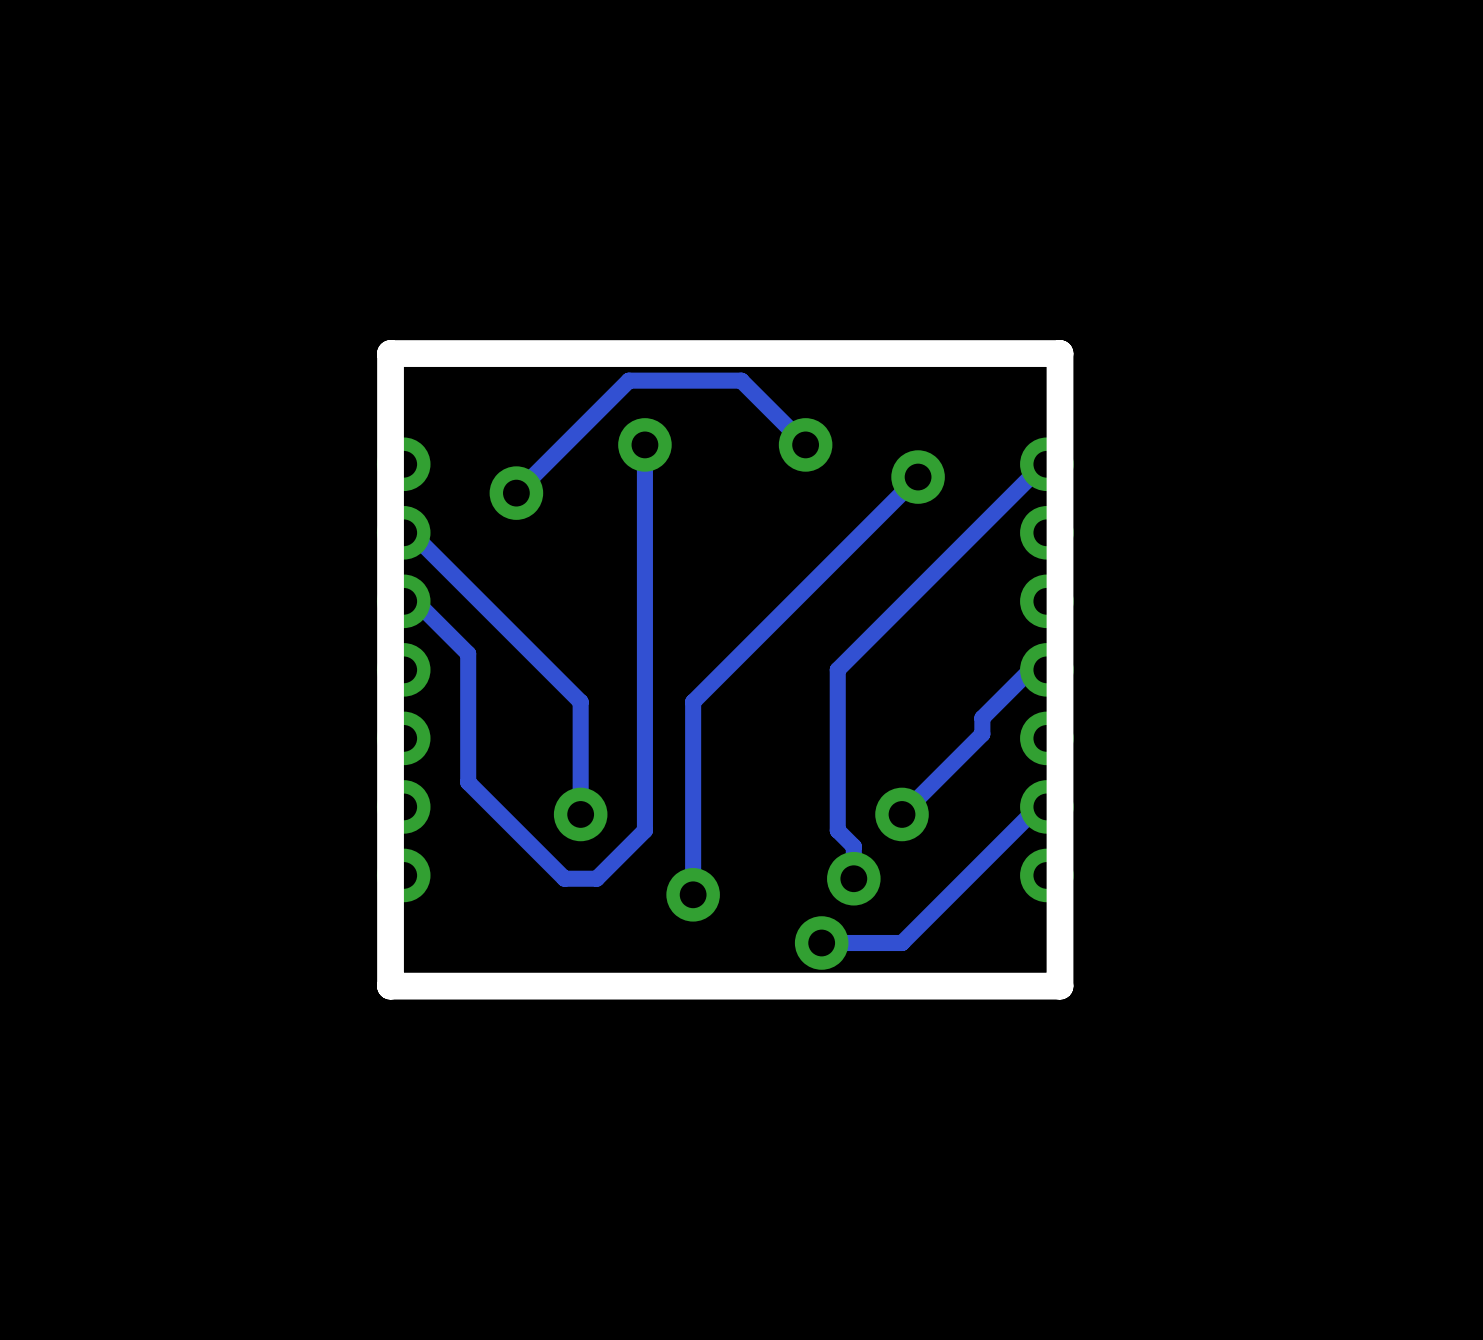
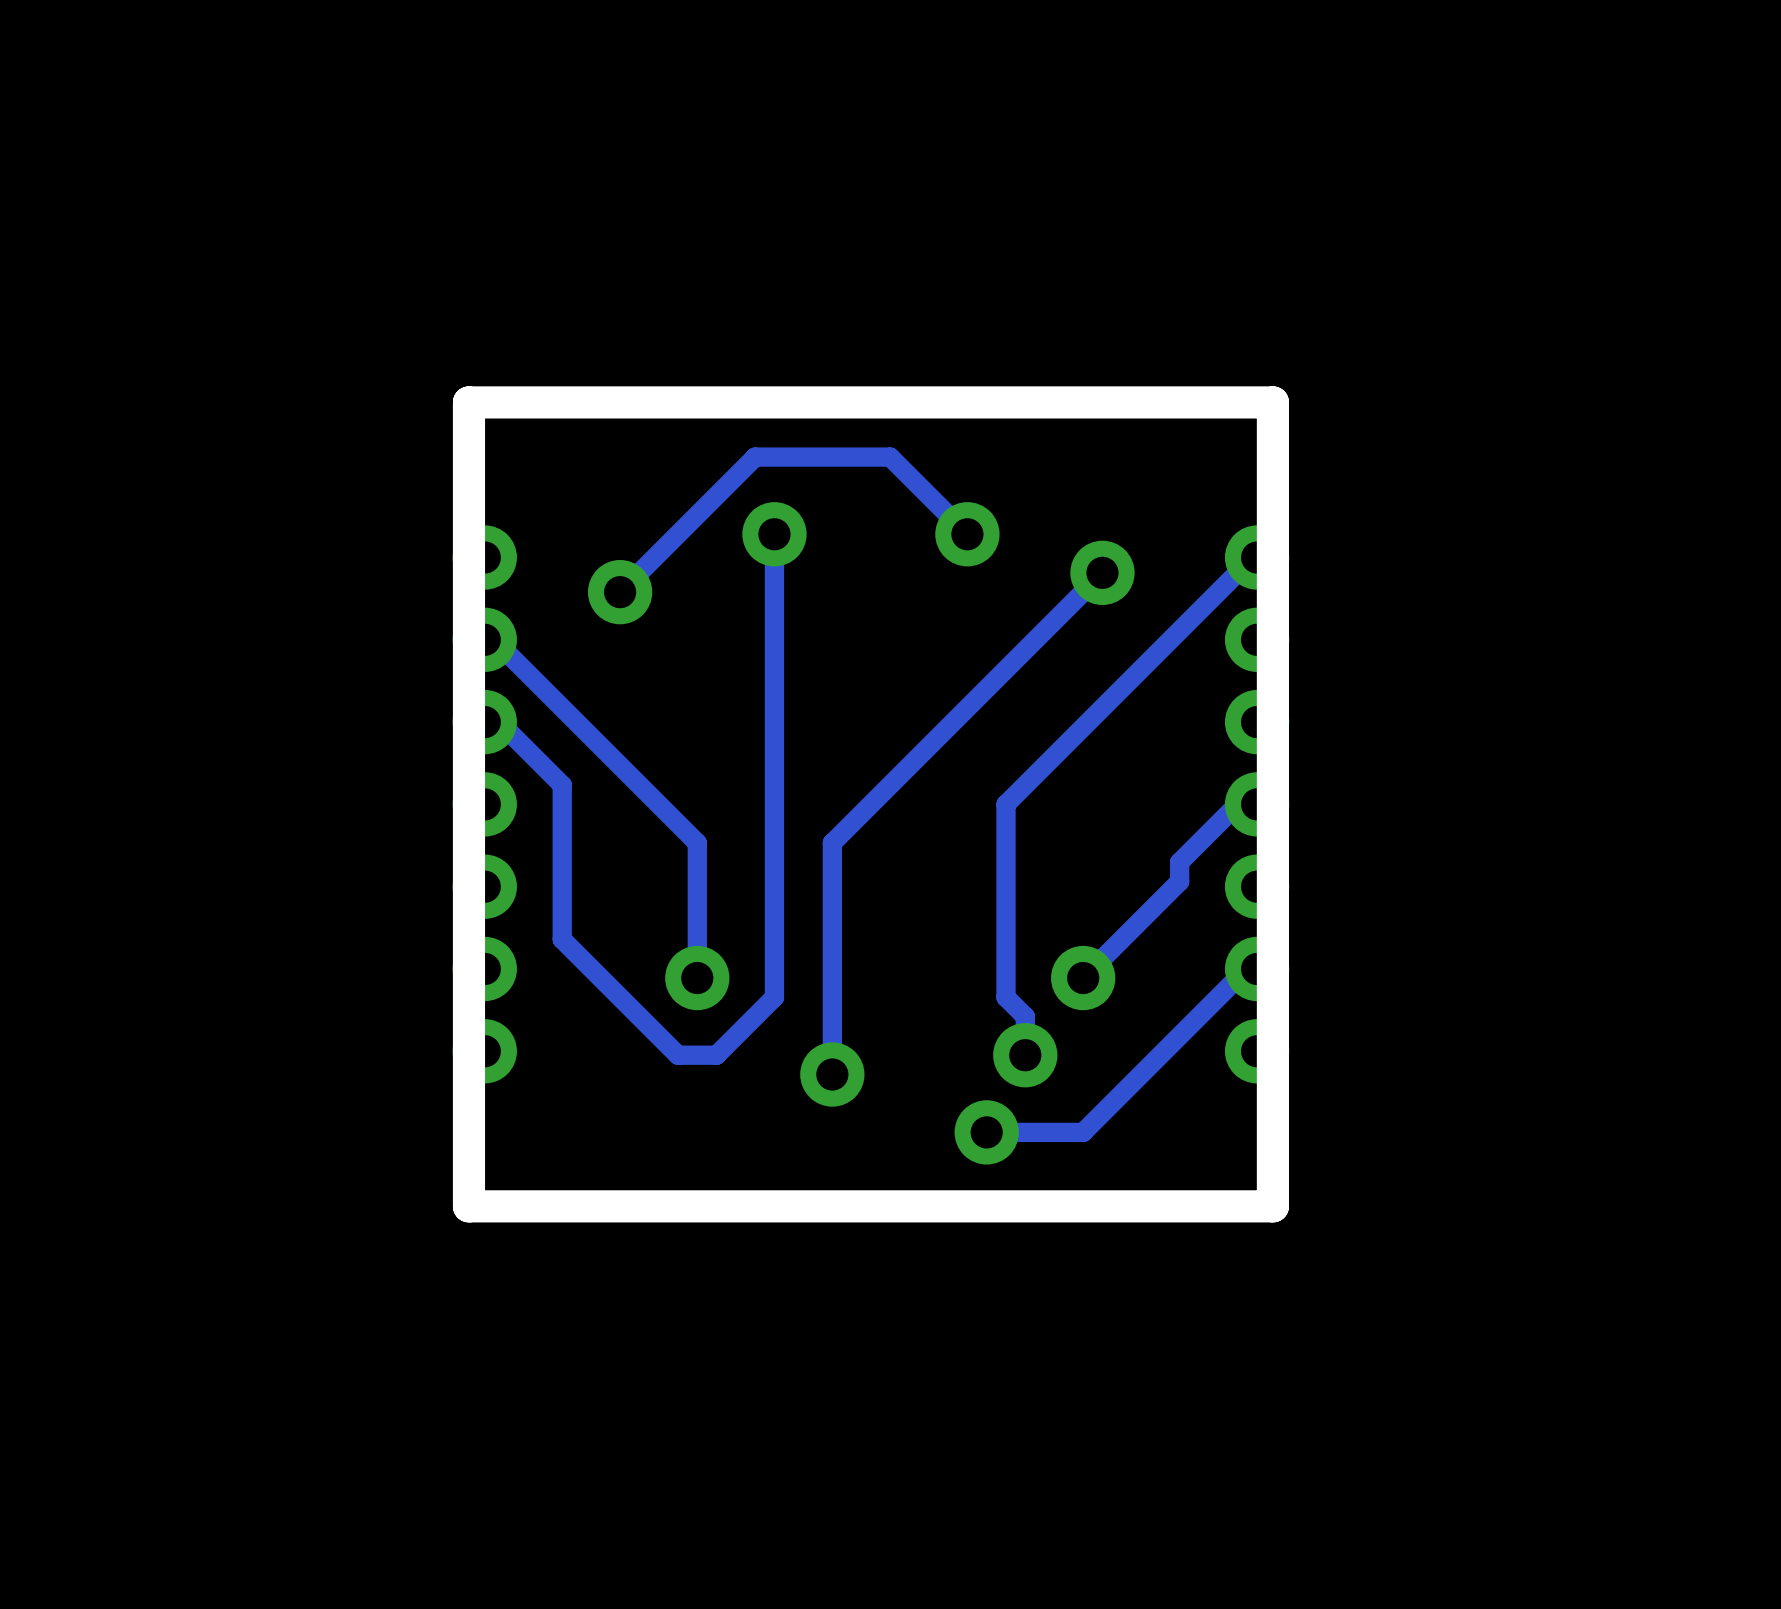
board edge: (1060, 353) (390, 353) -> (1272, 424) (1272, 402) (468, 402) (468, 424)
board edge: (1060, 986) (390, 986) -> (1272, 1184) (1272, 1206) (468, 1206) (468, 1184)

